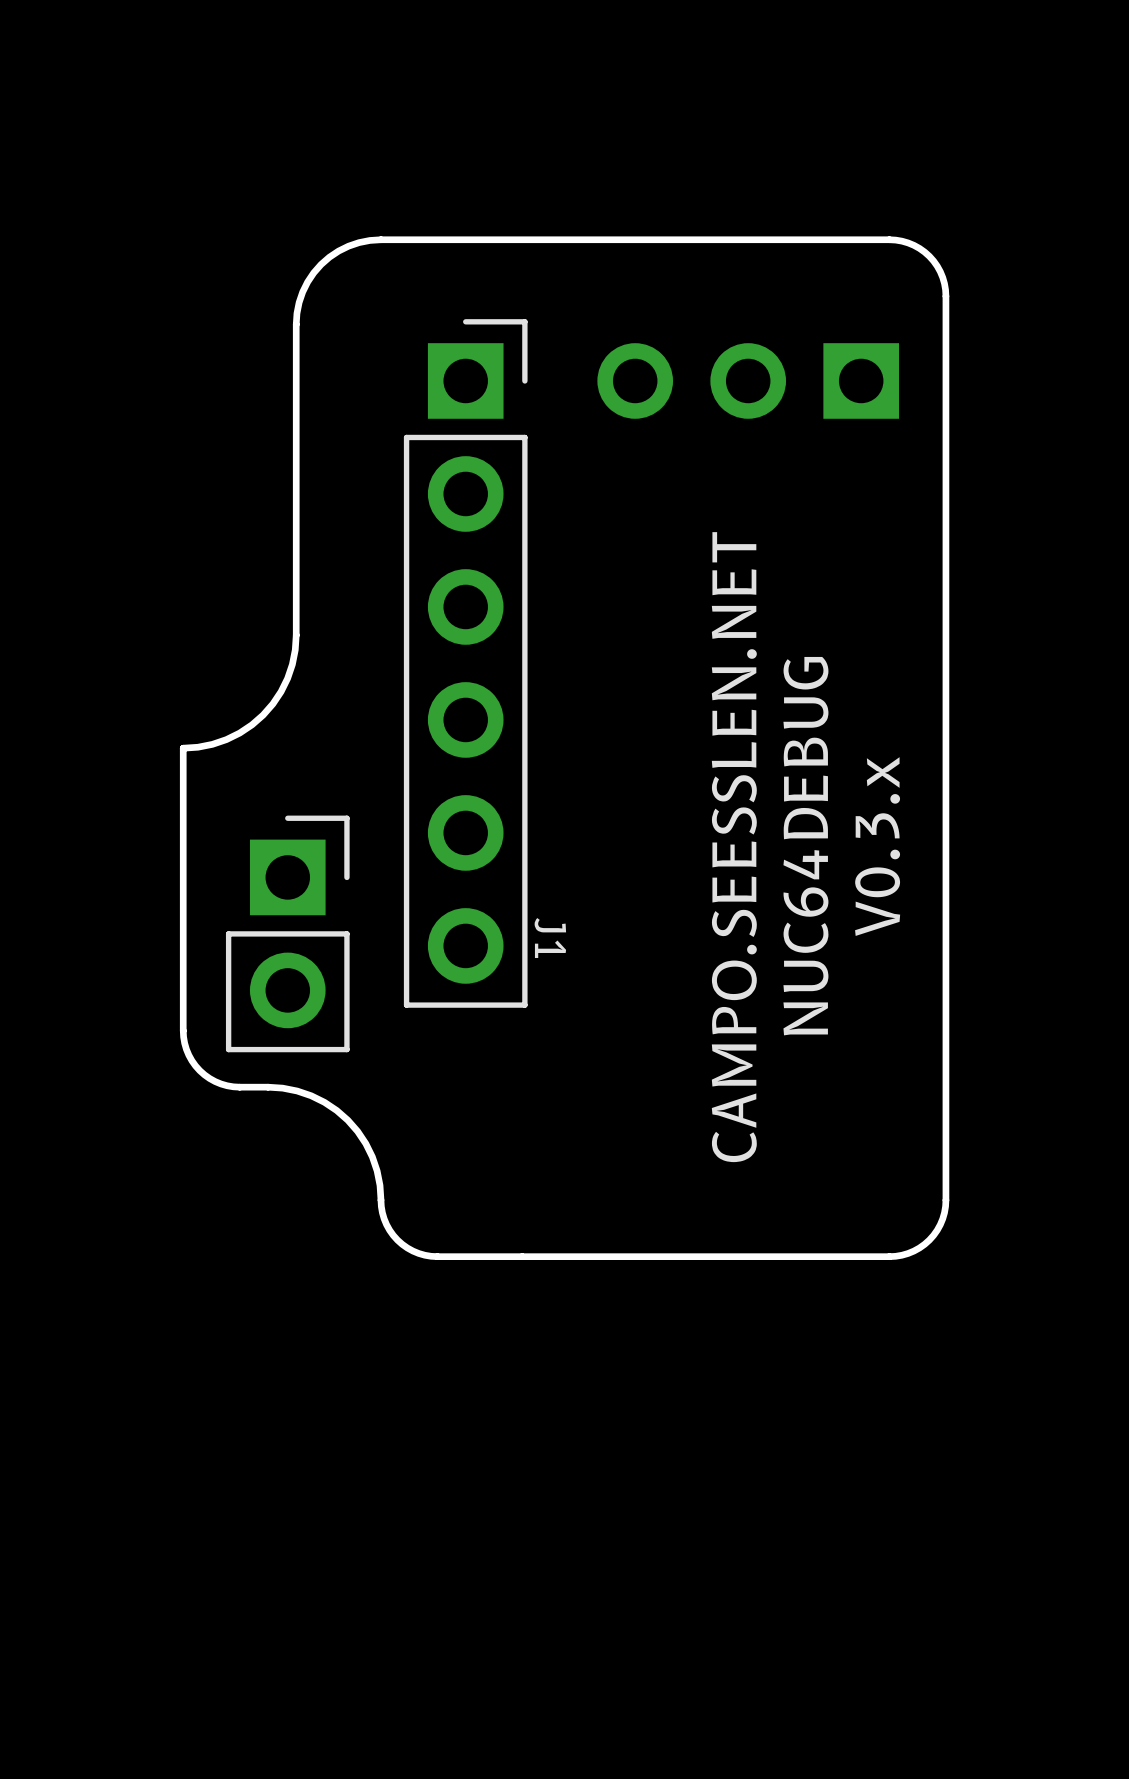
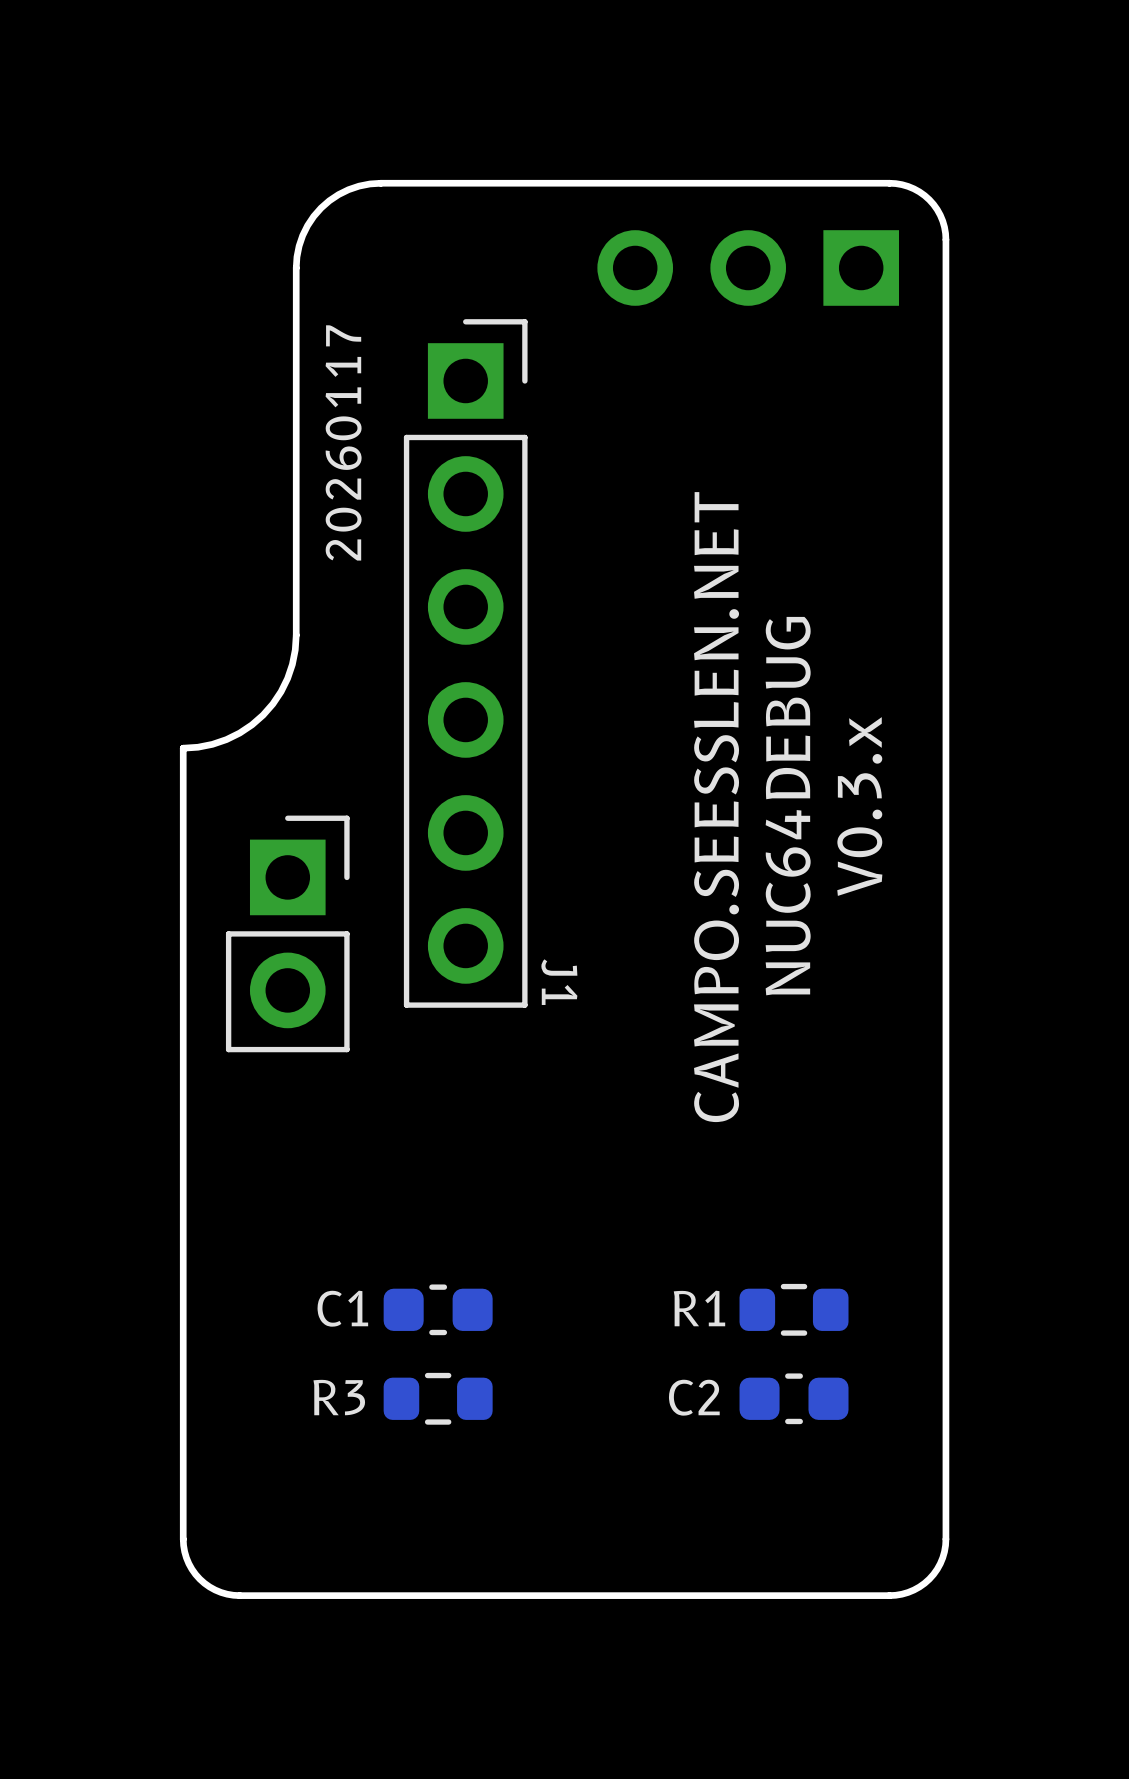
board edge: (945, 296) (942, 277) (933, 261) (919, 248) (895, 240) (380, 239) (348, 246) (321, 264) (302, 292) (296, 324) -> (945, 296) (945, 239) (942, 221) (929, 199) (913, 188) (902, 184) (380, 183) (359, 186) (338, 194) (321, 208) (307, 225) (296, 256) (296, 324)
part position: (748, 380) -> (748, 267)
text: none -> 20260117 (343, 442)
text position: NUC64DEBUG (805, 846) -> NUC64DEBUG (788, 806)
text position: V0.3.x (877, 846) -> V0.3.x (859, 806)
text position: CAMPO.SEESSLEN.NET (734, 847) -> CAMPO.SEESSLEN.NET (716, 807)
J1 name position: J1 (550, 938) -> J1 (559, 982)
board edge: (183, 1030) (184, 1043) (191, 1060) (199, 1070) (215, 1081) (233, 1086) (282, 1088) (297, 1091) (324, 1102) (347, 1120) (357, 1131) (372, 1156) (380, 1185) (382, 1212) (389, 1230) (402, 1244) (424, 1255) (895, 1256) (913, 1251) (929, 1240) (940, 1224) (945, 1200) -> (183, 1030) (183, 1545) (188, 1563) (199, 1579) (215, 1590) (227, 1594) (889, 1595) (913, 1590) (933, 1574) (940, 1563) (945, 1545) (945, 1200)
C1: none -> (438, 1309)
R1: none -> (794, 1309)
R3: none -> (438, 1398)
C2: none -> (794, 1398)

